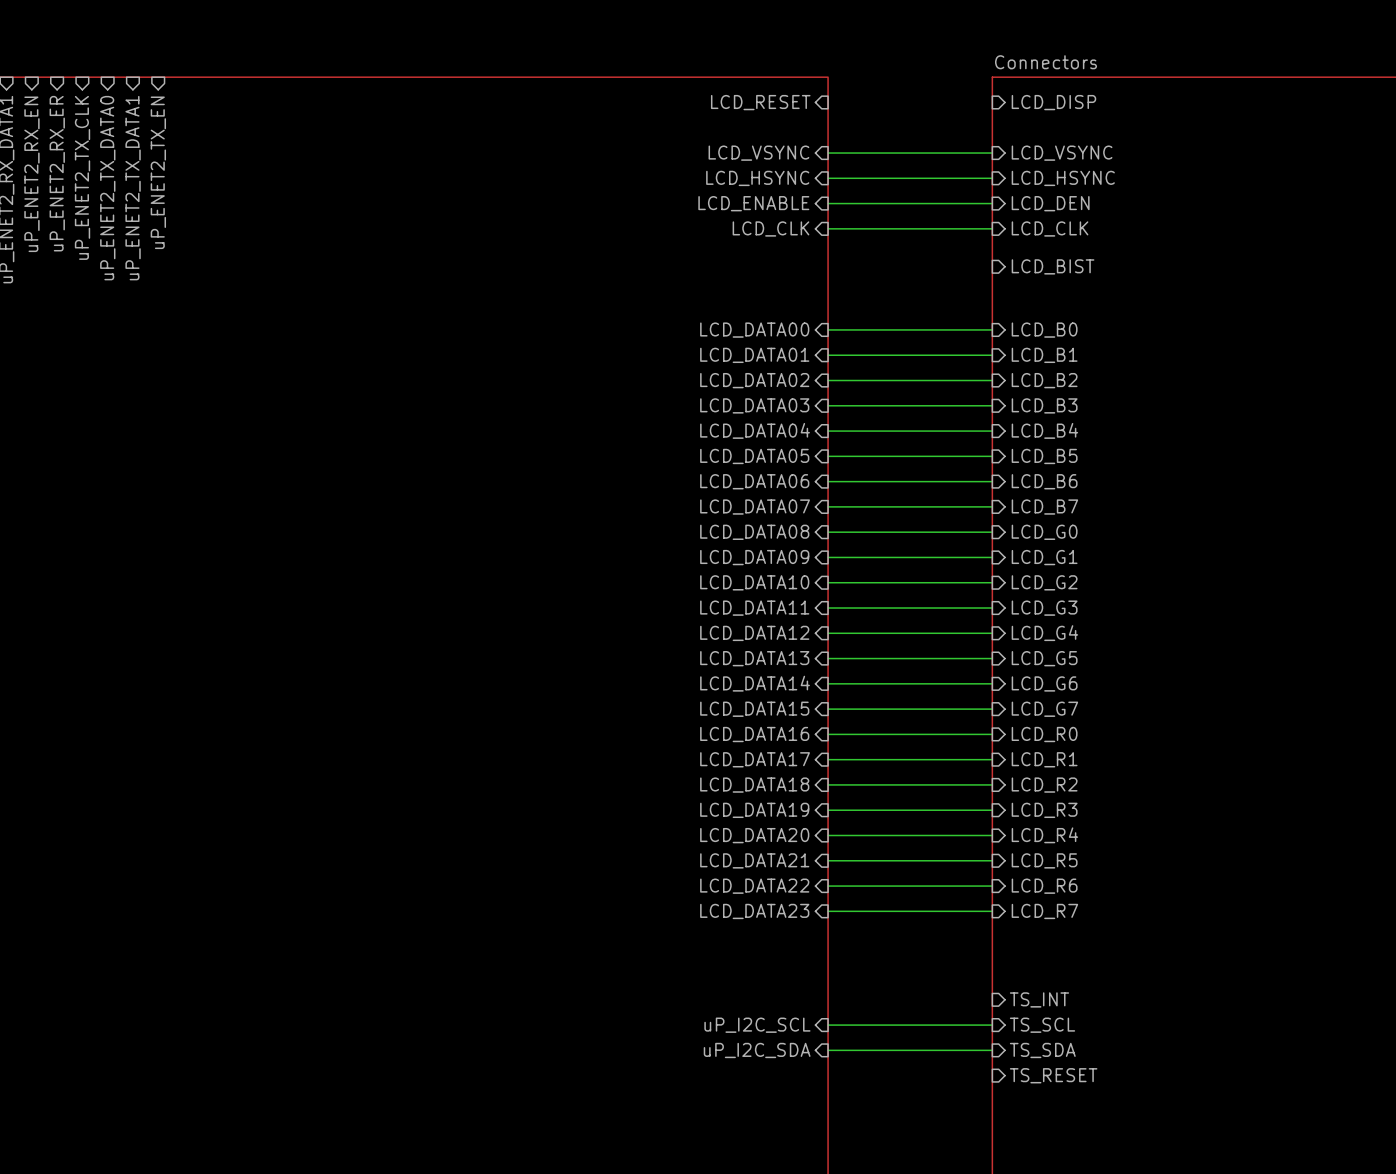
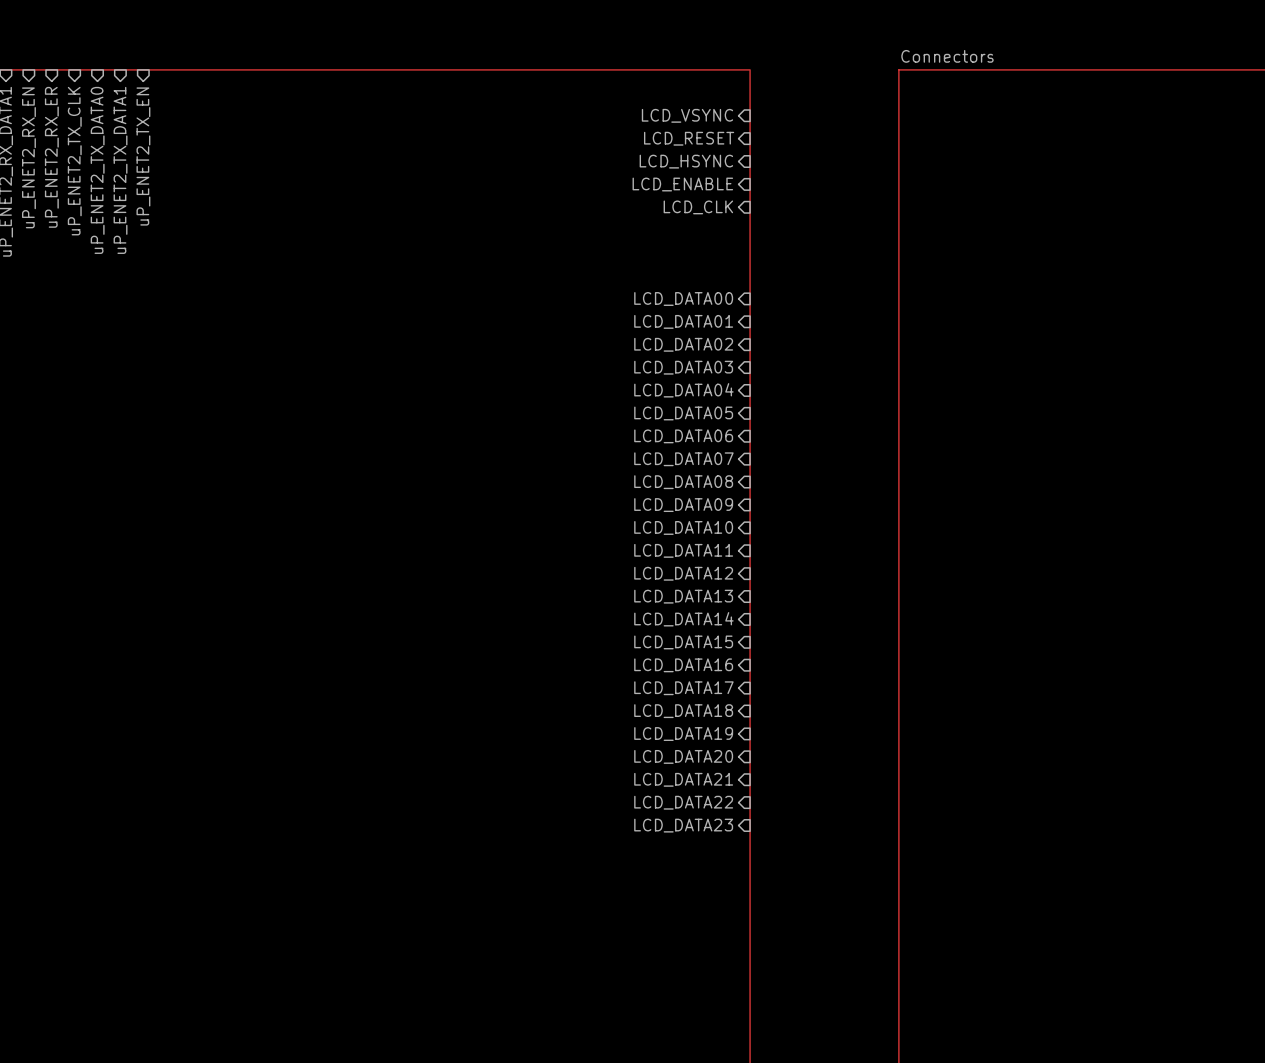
sheet pin: LCD_RESET (760, 102) -> none
sheet pin: LCD_DISP (1053, 102) -> none
sheet pin: LCD_VSYNC (758, 153) -> LCD_RESET (689, 138)
wire: (828, 153) (992, 153) -> none
sheet pin rotation: 0° (1062, 153) -> 180° (687, 115)
sheet pin position: LCD_VSYNC (1062, 153) -> LCD_VSYNC (687, 115)
wire: (828, 178) (992, 178) -> none
sheet pin: LCD_HSYNC (1063, 178) -> none
wire: (828, 203) (992, 203) -> none
sheet pin: LCD_DEN (1050, 203) -> none
wire: (828, 228) (992, 228) -> none
sheet pin: LCD_CLK (1050, 228) -> none
sheet pin: LCD_BIST (1053, 266) -> none
wire: (828, 329) (992, 329) -> none
sheet pin: LCD_B0 (1044, 330) -> none
wire: (828, 355) (992, 355) -> none
sheet pin: LCD_B1 (1044, 355) -> none
wire: (828, 380) (992, 380) -> none
sheet pin: LCD_B2 (1044, 380) -> none
wire: (828, 405) (992, 405) -> none
sheet pin: LCD_B3 (1044, 405) -> none
sheet pin: LCD_B4 (1044, 430) -> none
wire: (828, 431) (992, 431) -> none
wire: (828, 456) (992, 456) -> none
sheet pin: LCD_B5 (1044, 456) -> none
wire: (828, 481) (992, 481) -> none
sheet pin: LCD_B6 (1044, 481) -> none
wire: (828, 506) (992, 506) -> none
sheet pin: LCD_B7 (1044, 507) -> none
wire: (828, 532) (992, 532) -> none
sheet pin: LCD_G0 (1044, 532) -> none
wire: (828, 557) (992, 557) -> none
sheet pin: LCD_G1 (1044, 557) -> none
wire: (828, 582) (992, 582) -> none
sheet pin: LCD_G2 (1044, 582) -> none
wire: (828, 608) (992, 608) -> none
sheet pin: LCD_G3 (1044, 608) -> none
wire: (828, 633) (992, 633) -> none
sheet pin: LCD_G4 (1044, 633) -> none
wire: (828, 658) (992, 658) -> none
sheet pin: LCD_G5 (1044, 658) -> none
wire: (828, 683) (992, 683) -> none
sheet pin: LCD_G6 (1044, 683) -> none
wire: (828, 709) (992, 709) -> none
sheet pin: LCD_G7 (1044, 709) -> none
wire: (828, 734) (992, 734) -> none
sheet pin: LCD_R0 (1044, 734) -> none
wire: (828, 759) (992, 759) -> none
sheet pin: LCD_R1 (1044, 759) -> none
wire: (828, 784) (992, 784) -> none
sheet pin: LCD_R2 (1044, 785) -> none
wire: (828, 810) (992, 810) -> none
sheet pin: LCD_R3 (1044, 810) -> none
wire: (828, 835) (992, 835) -> none
sheet pin: LCD_R4 (1044, 835) -> none
wire: (828, 860) (992, 860) -> none
sheet pin: LCD_R5 (1044, 860) -> none
wire: (828, 886) (992, 886) -> none
sheet pin: LCD_R6 (1044, 886) -> none
wire: (828, 911) (992, 911) -> none
sheet pin: LCD_R7 (1044, 911) -> none
sheet pin: TS_INT (1039, 999) -> none
sheet pin: uP_I2C_SCL (757, 1025) -> none
wire: (828, 1025) (992, 1025) -> none
sheet pin: TS_SCL (1042, 1025) -> none
sheet pin: uP_I2C_SDA (757, 1050) -> none
wire: (828, 1050) (992, 1050) -> none
sheet pin: TS_SDA (1042, 1050) -> none
sheet pin: TS_RESET (1053, 1075) -> none

